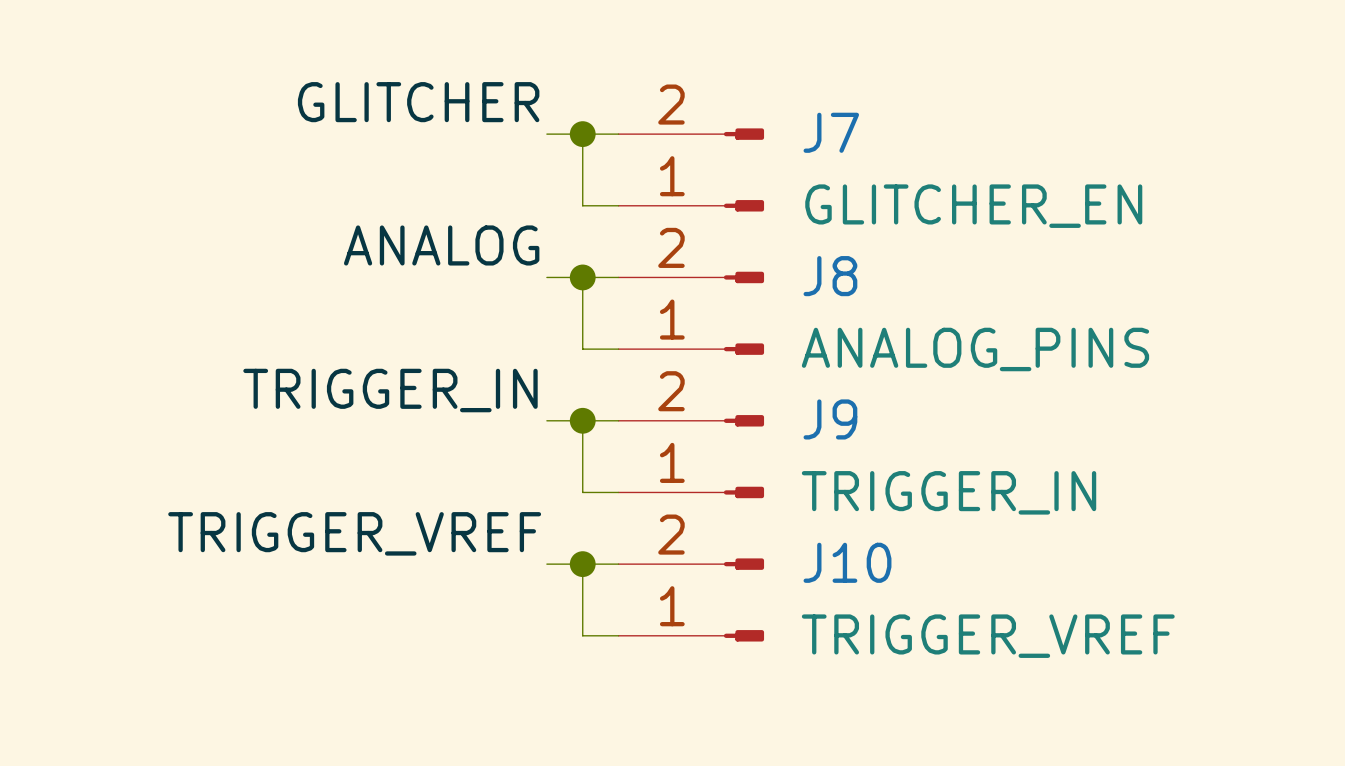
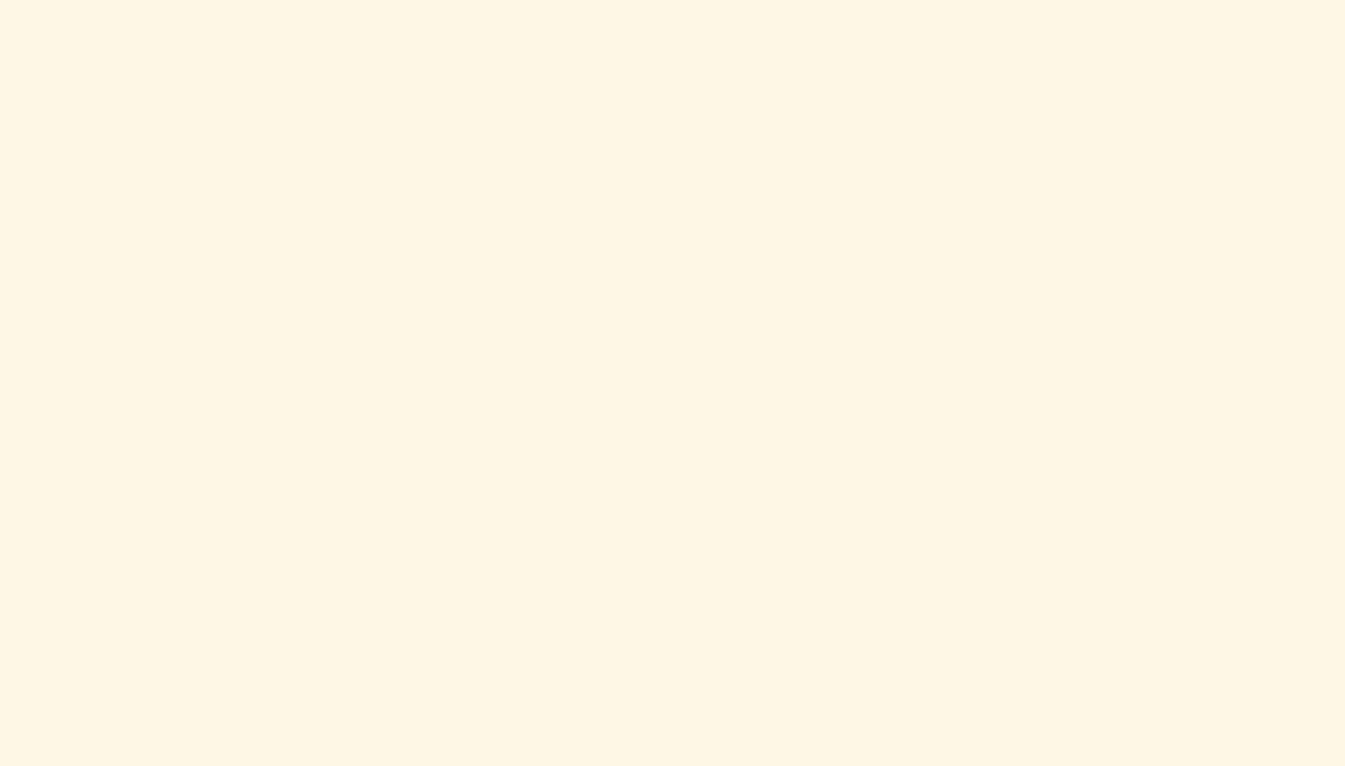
label: GLITCHER (418, 102) -> none
wire: (546, 134) (618, 134) -> none
wire: (582, 134) (582, 205) (618, 205) -> none
junction: (582, 134) -> none
J7: GLITCHER_EN (691, 169) -> none
label: ANALOG (441, 245) -> none
wire: (546, 277) (618, 277) -> none
wire: (582, 277) (582, 349) (618, 349) -> none
junction: (582, 277) -> none
J8: ANALOG_PINS (691, 313) -> none
label: TRIGGER_IN (390, 390) -> none
wire: (546, 420) (618, 420) -> none
wire: (582, 420) (582, 492) (618, 492) -> none
junction: (582, 420) -> none
J9: TRIGGER_IN (691, 456) -> none
label: TRIGGER_VREF (354, 533) -> none
wire: (546, 564) (618, 564) -> none
wire: (582, 564) (582, 635) (618, 635) -> none
junction: (582, 564) -> none
J10: TRIGGER_VREF (691, 599) -> none

